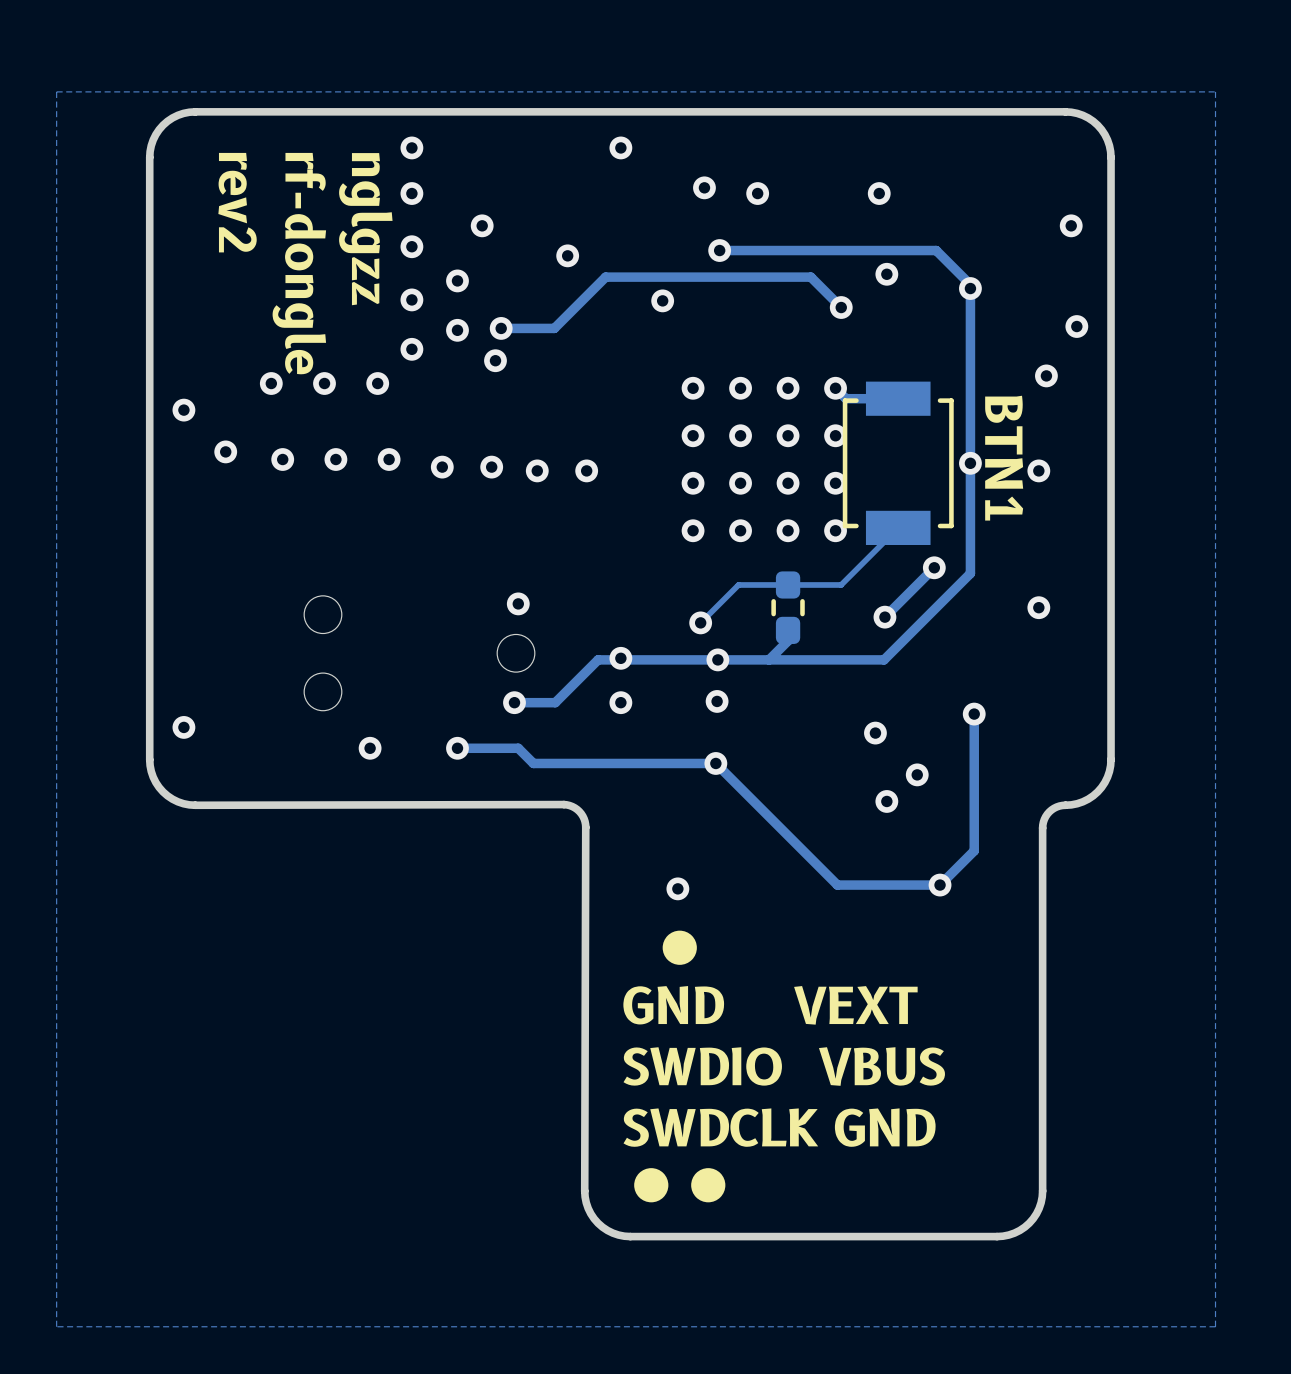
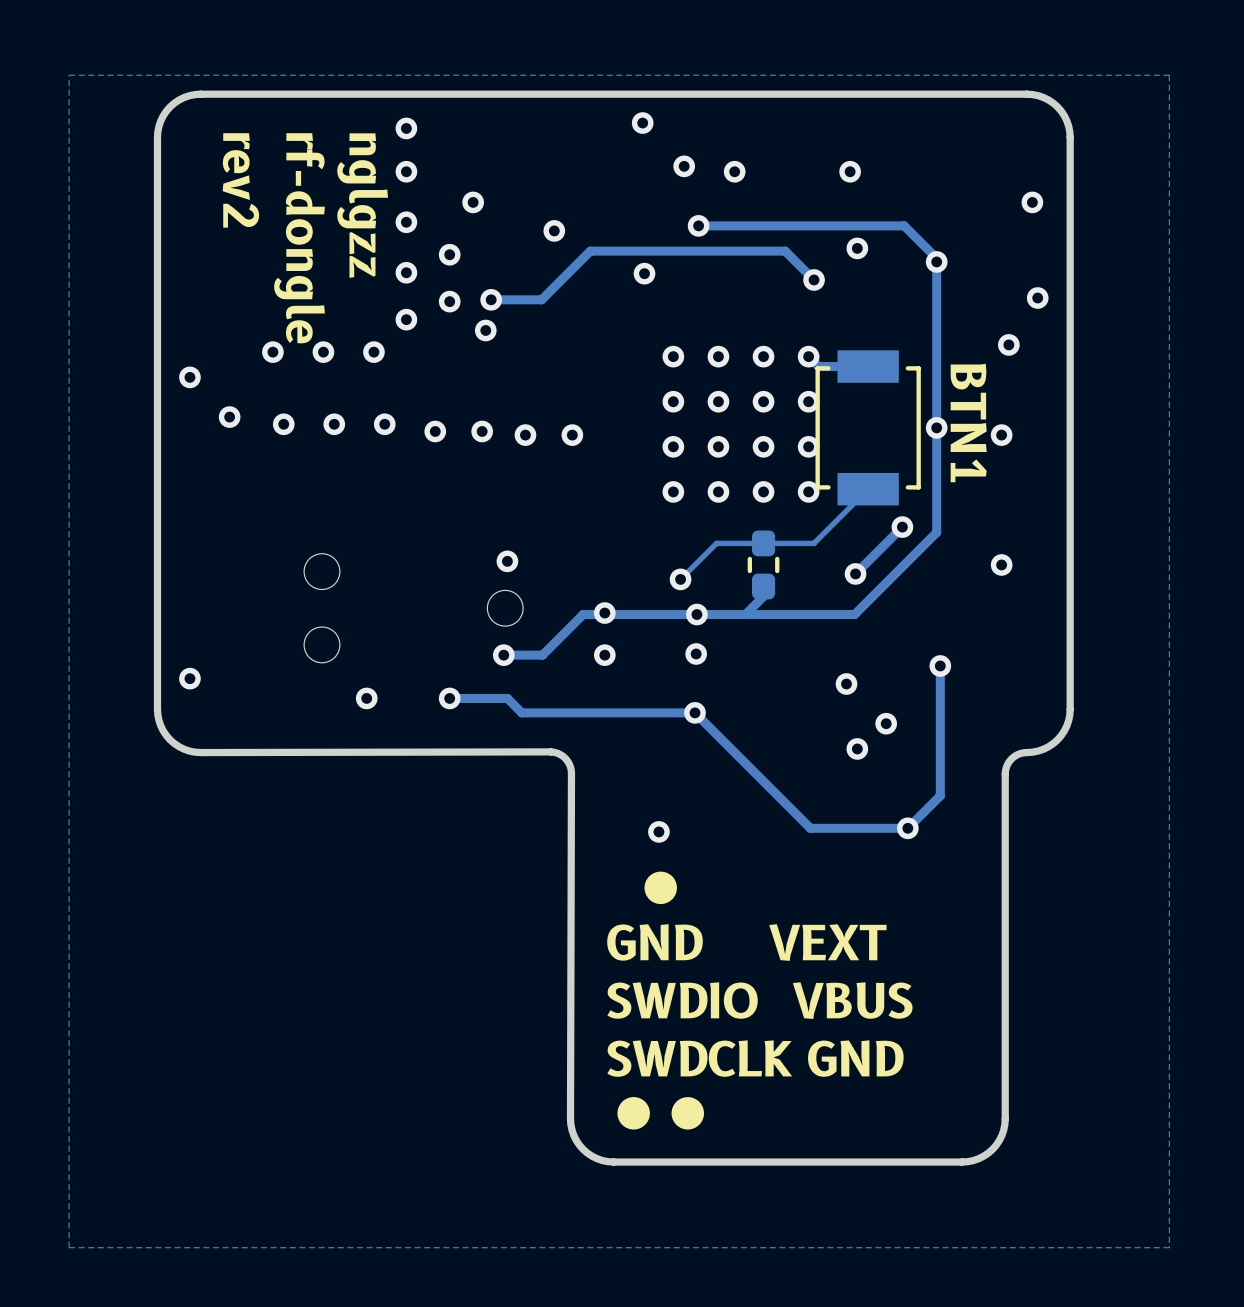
via position: (620, 147) -> (642, 123)

